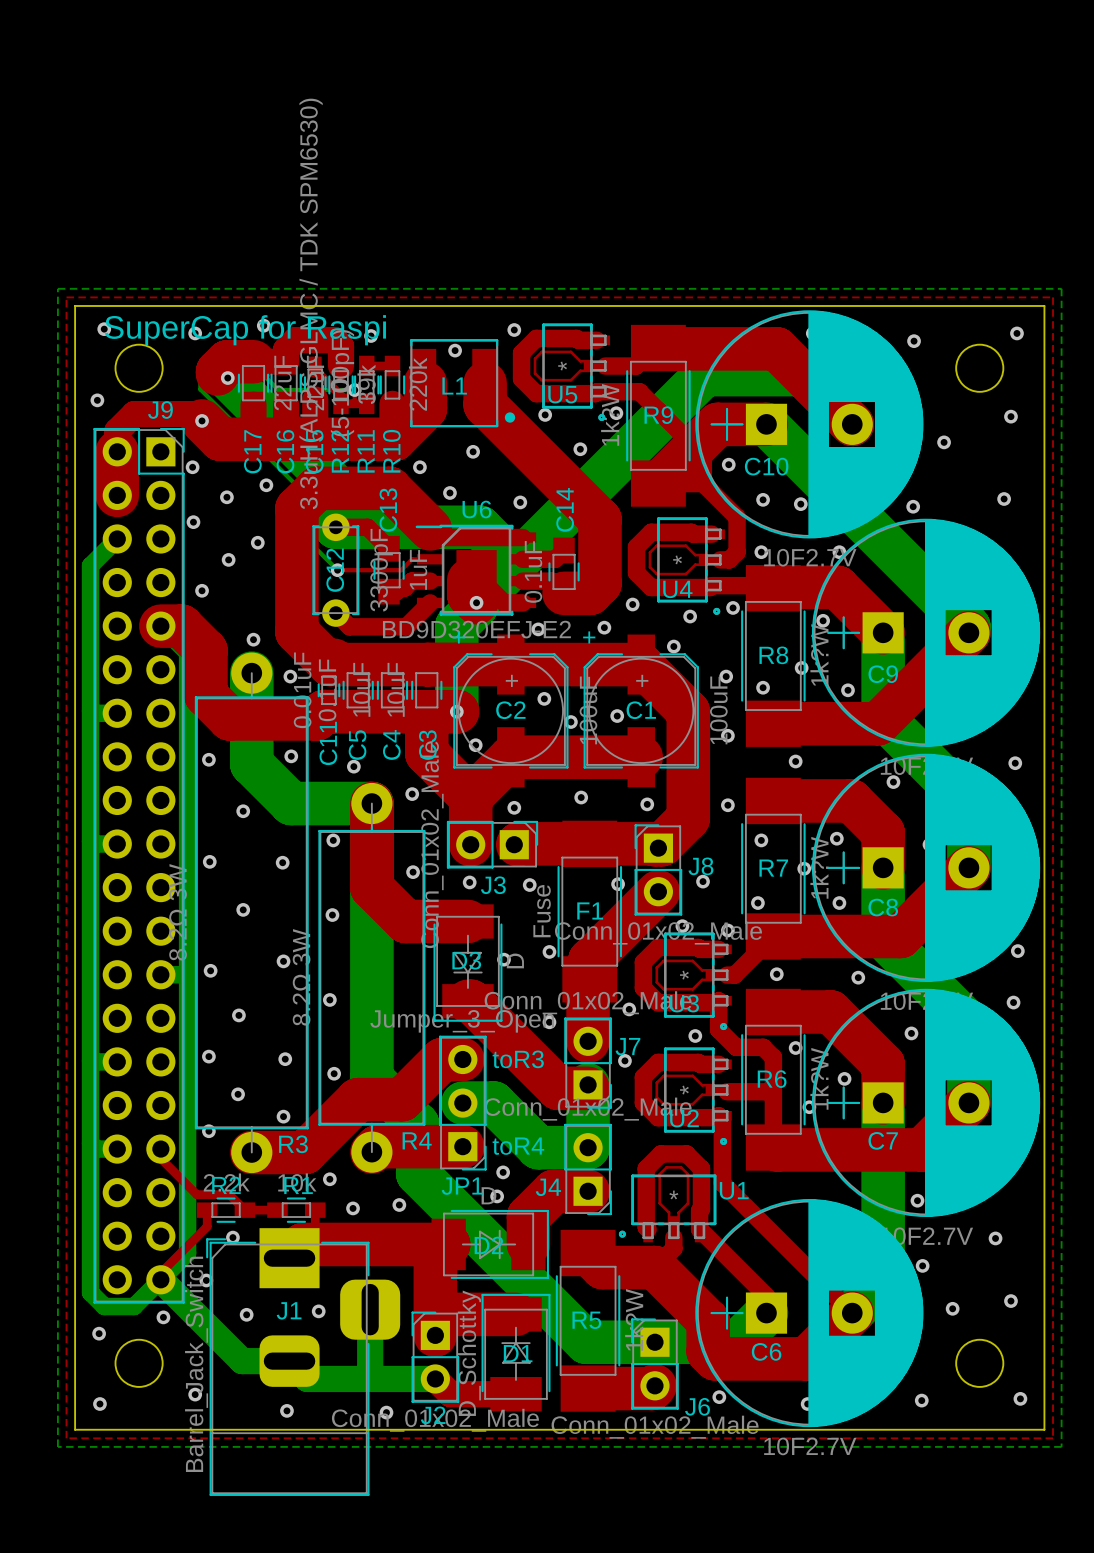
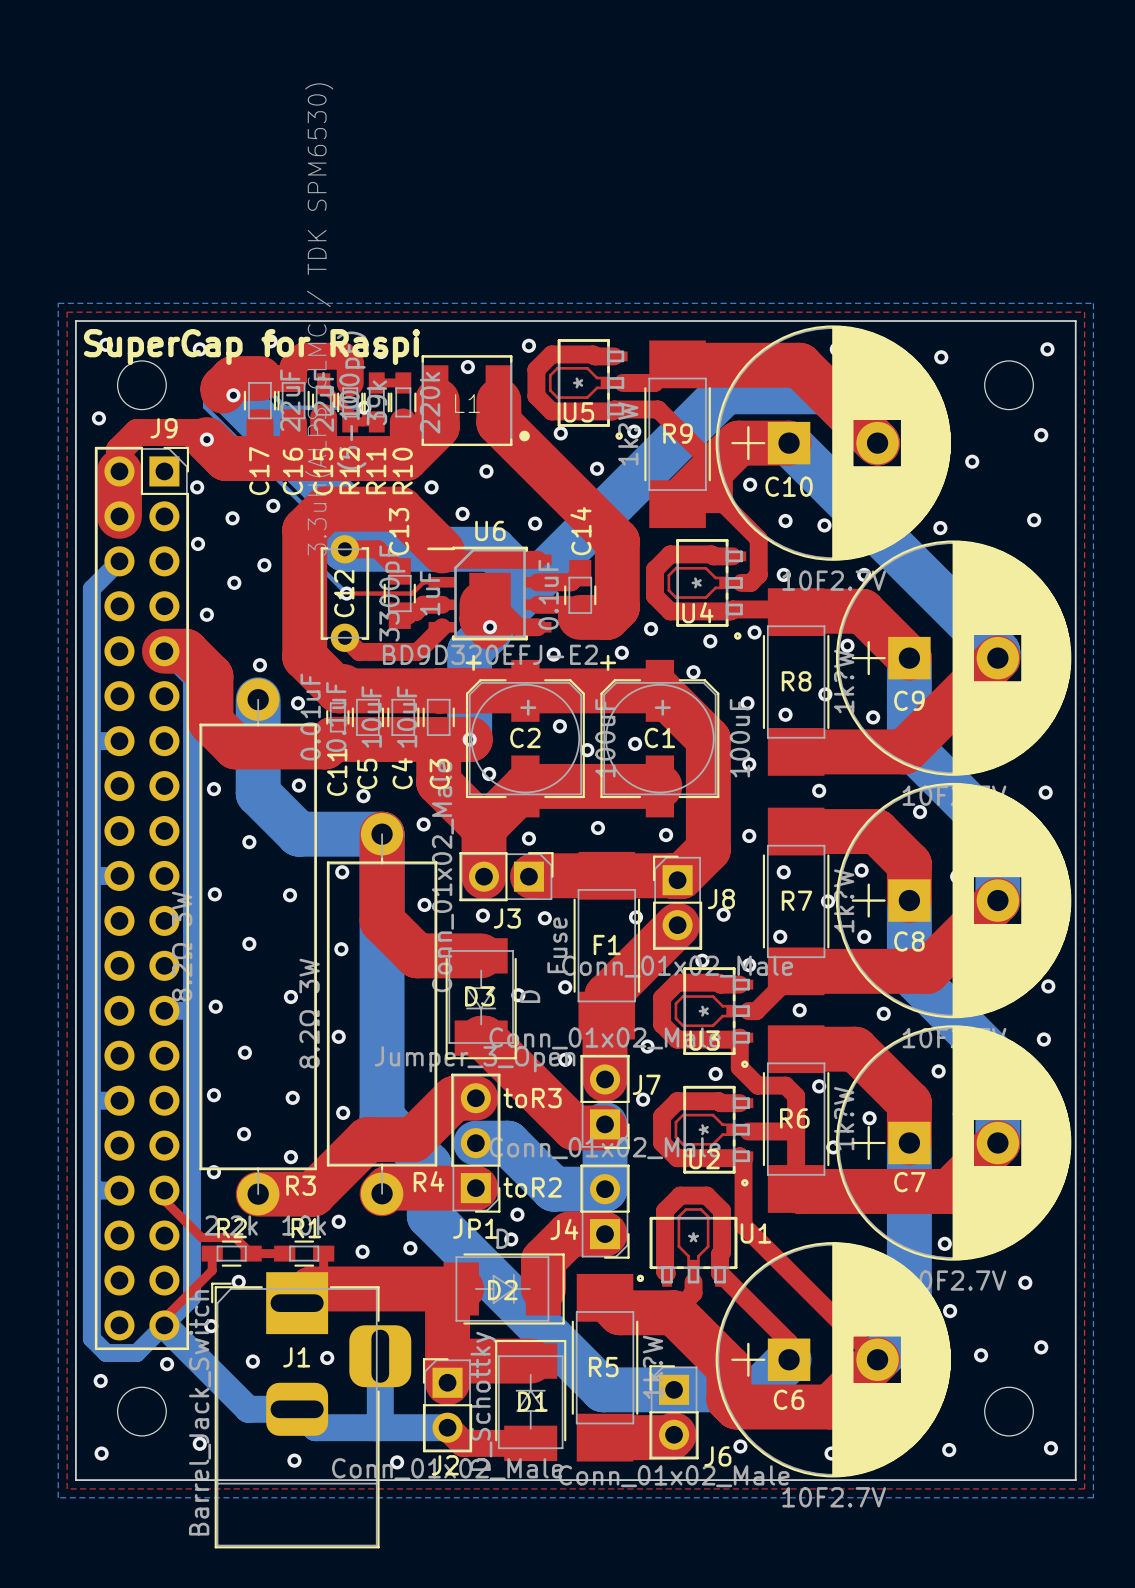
text: toR4 (518, 1146) -> toR2 (532, 1187)

